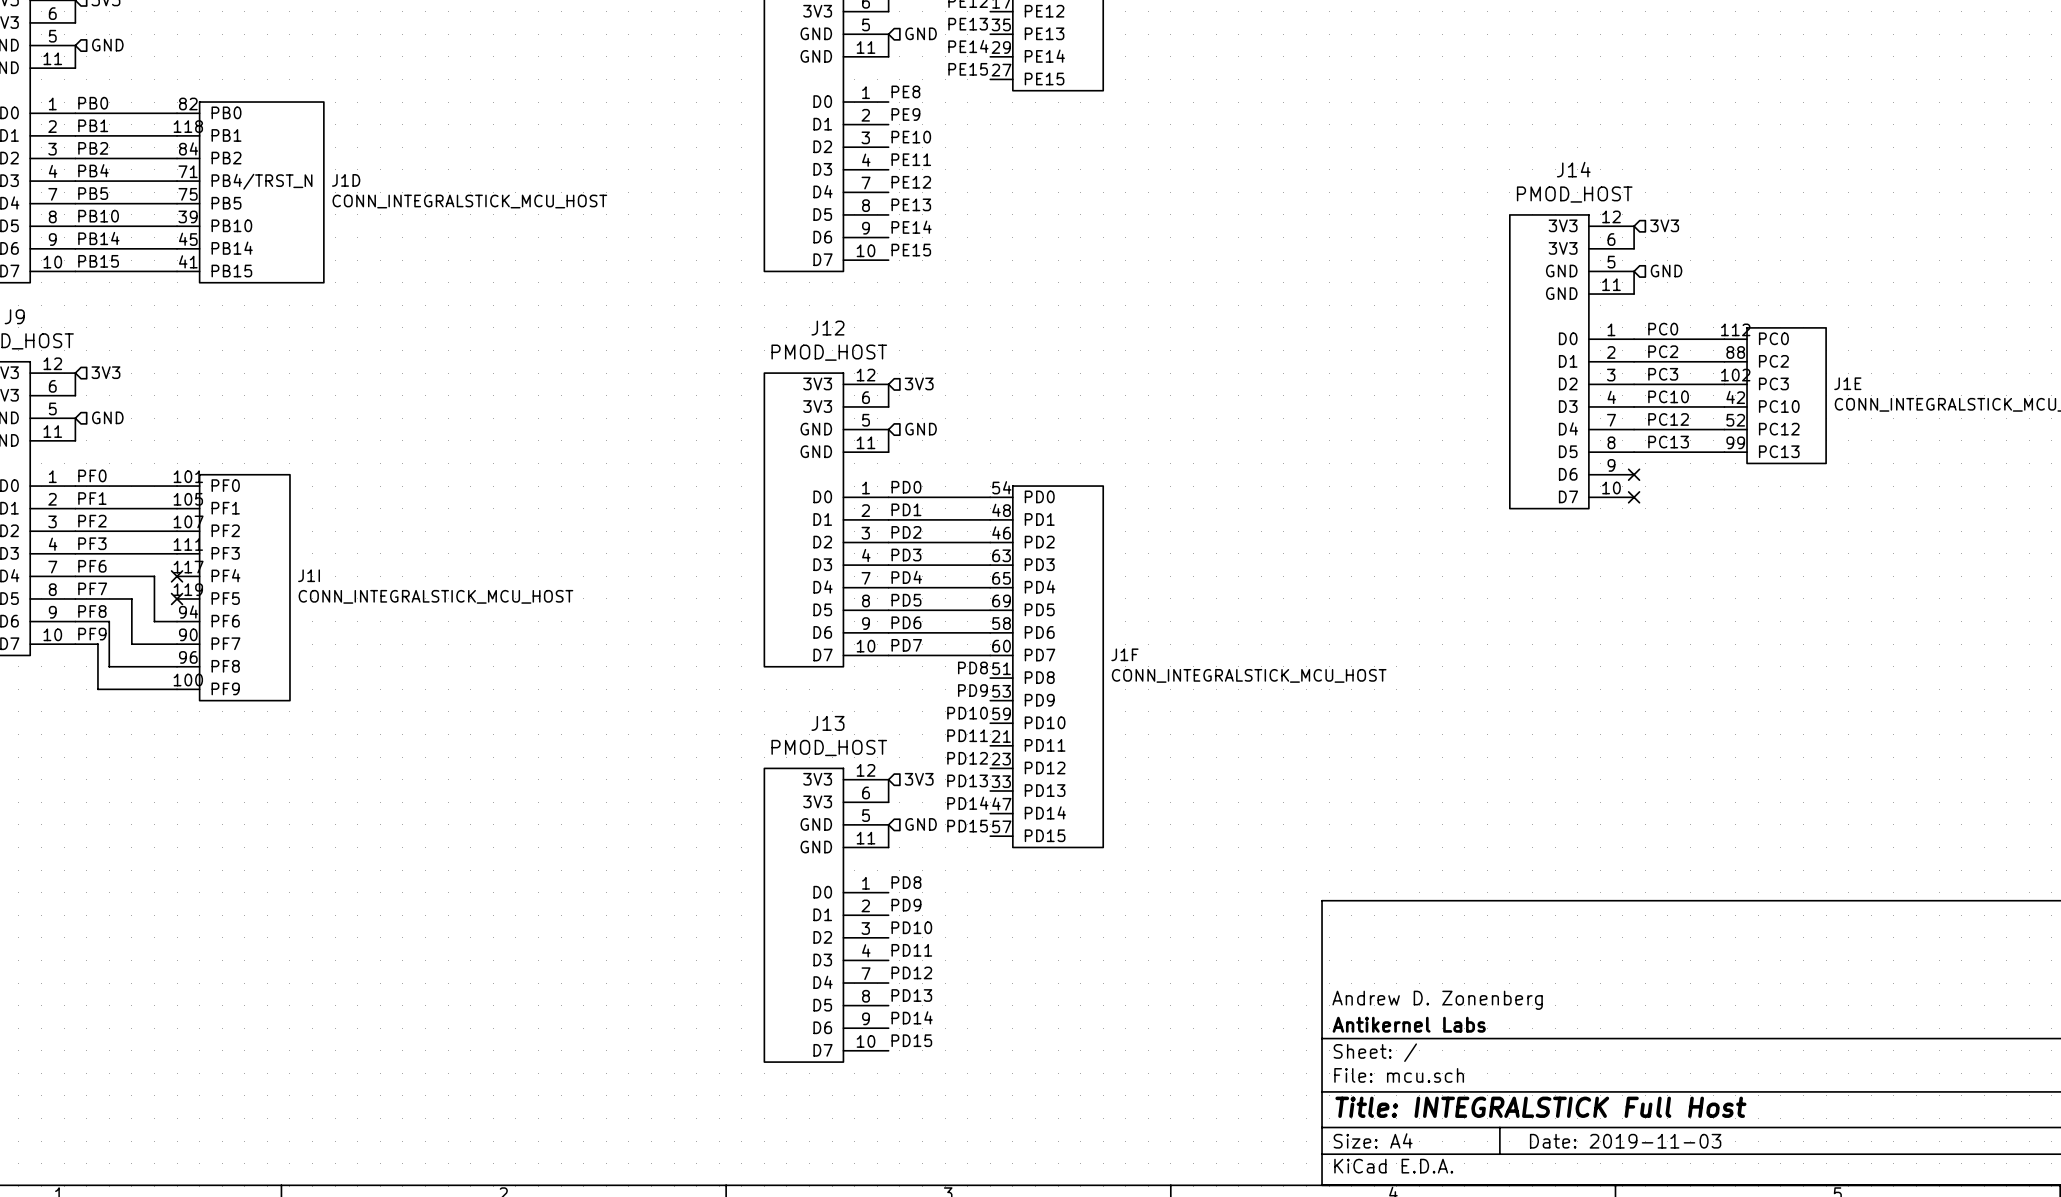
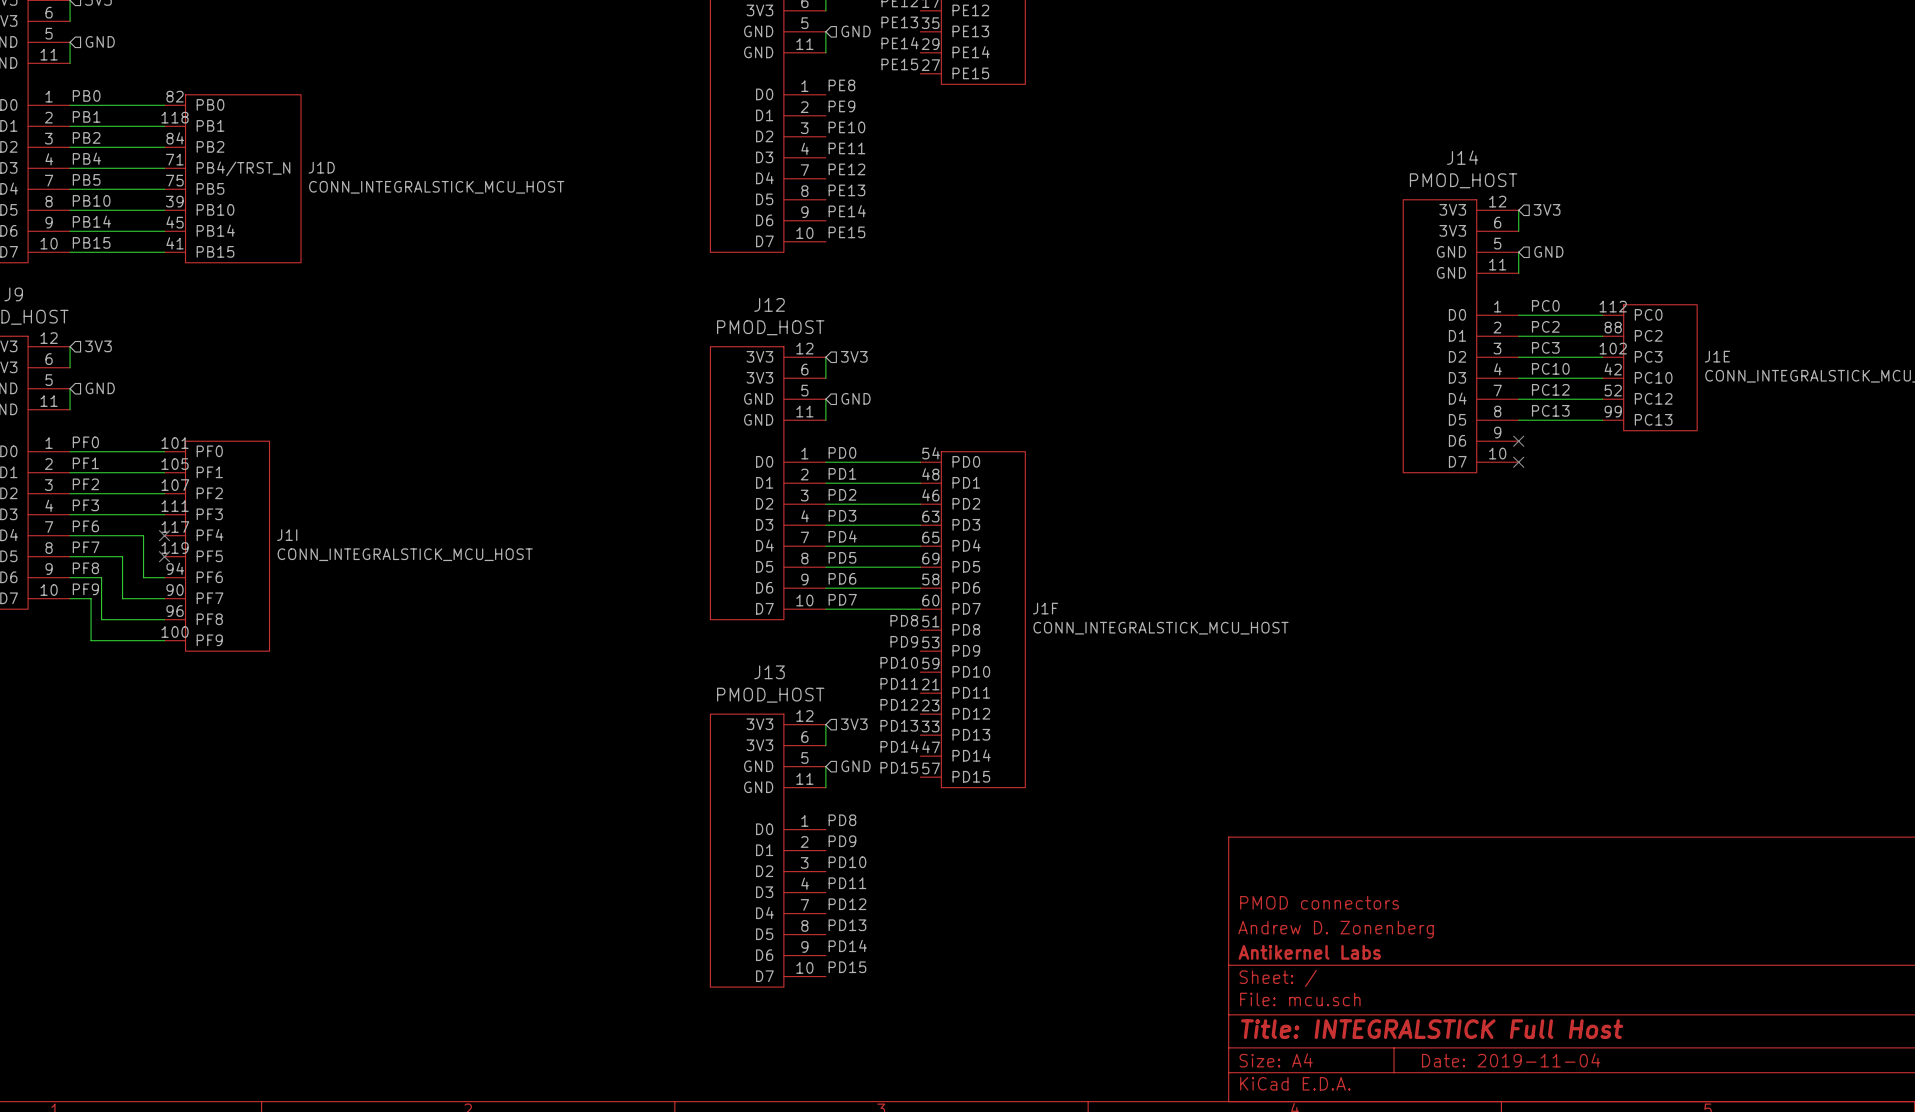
title block: none -> PMOD connectors (1319, 902)
title block: Date: 2019-11-03 (1625, 1141) -> Date: 2019-11-04 (1511, 1060)

